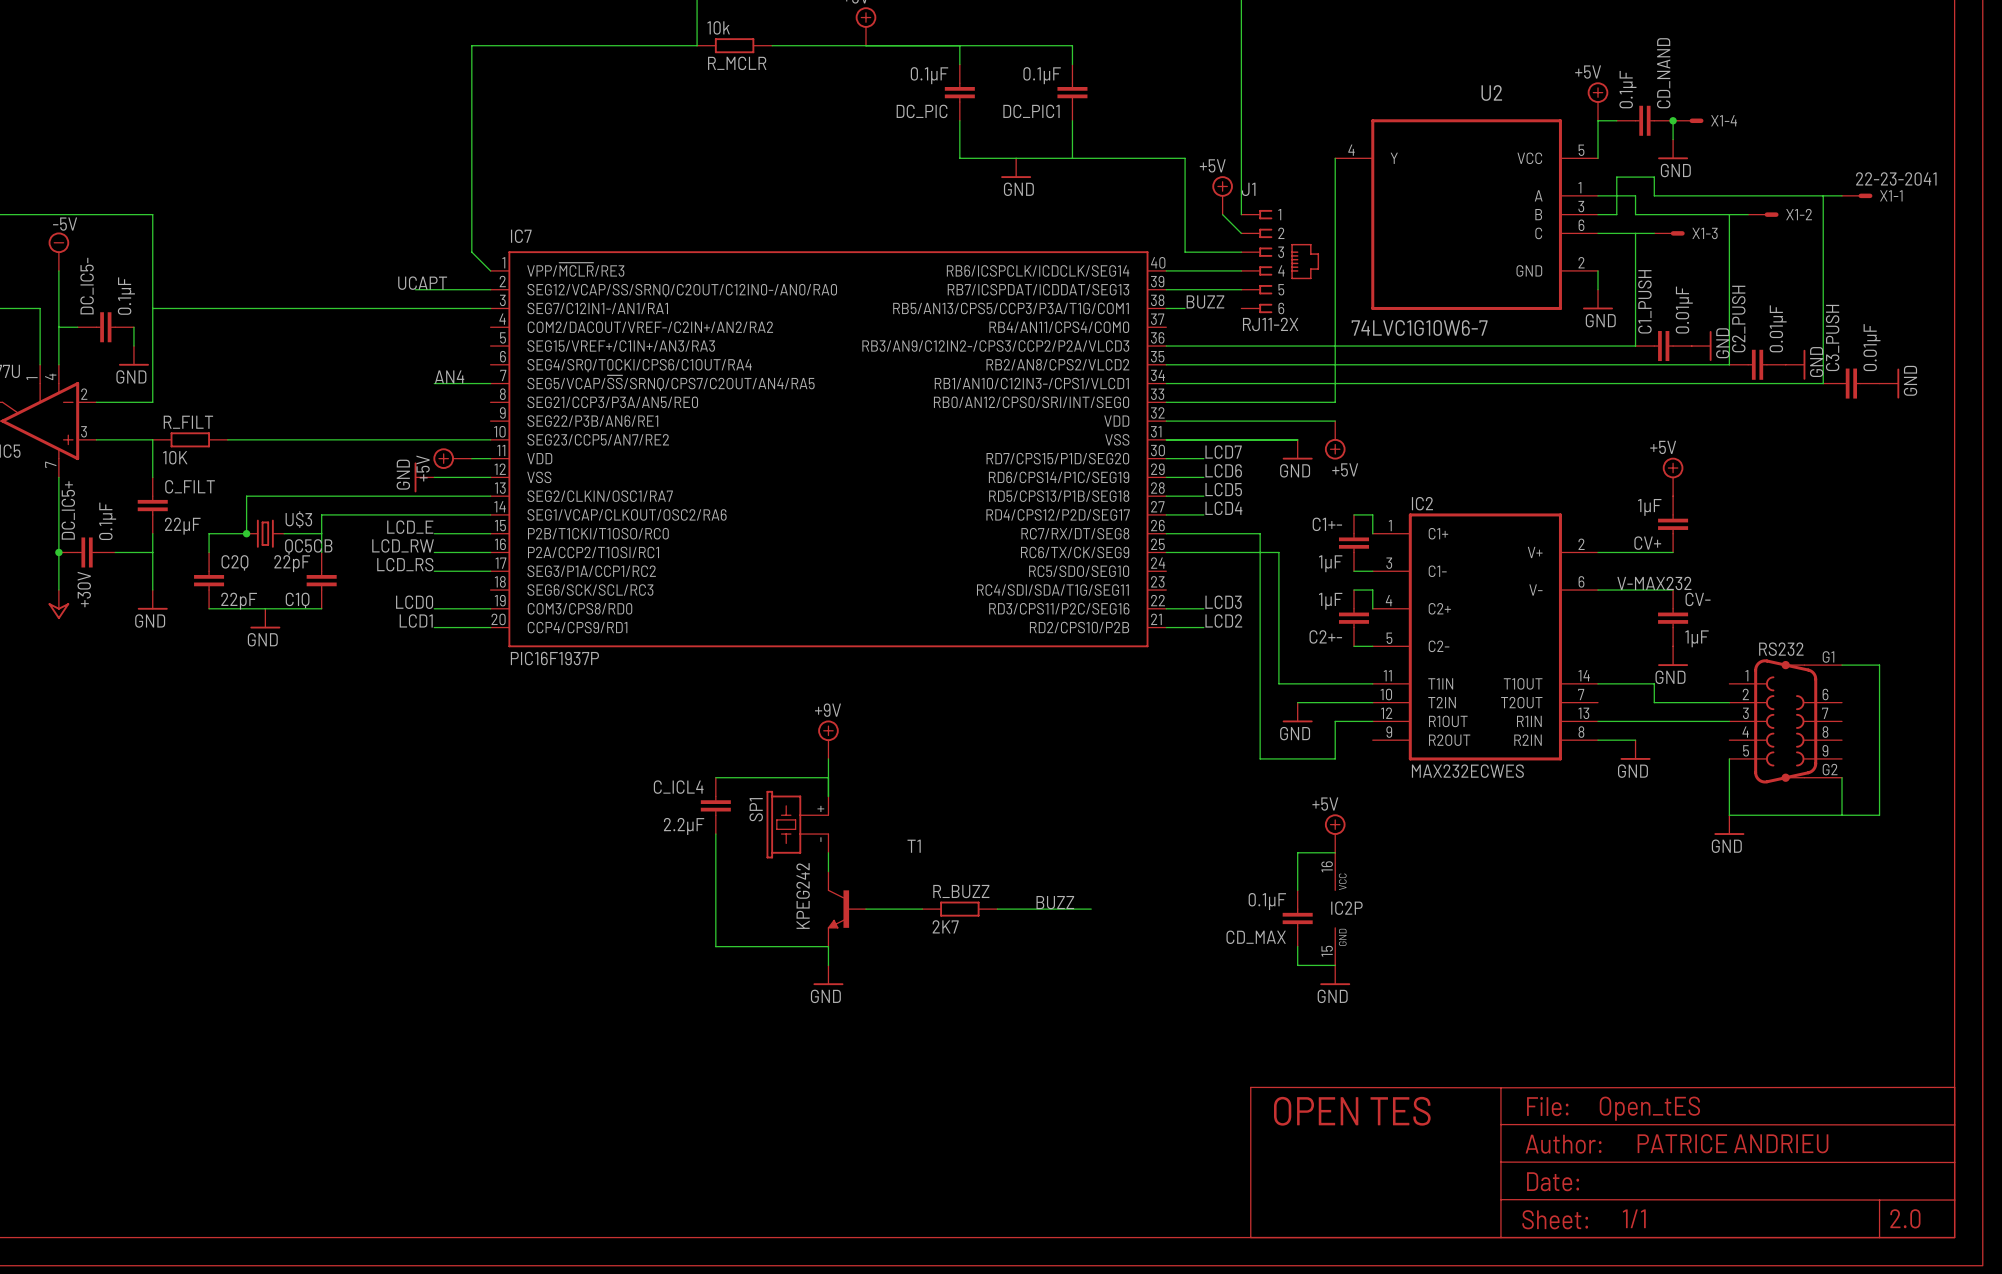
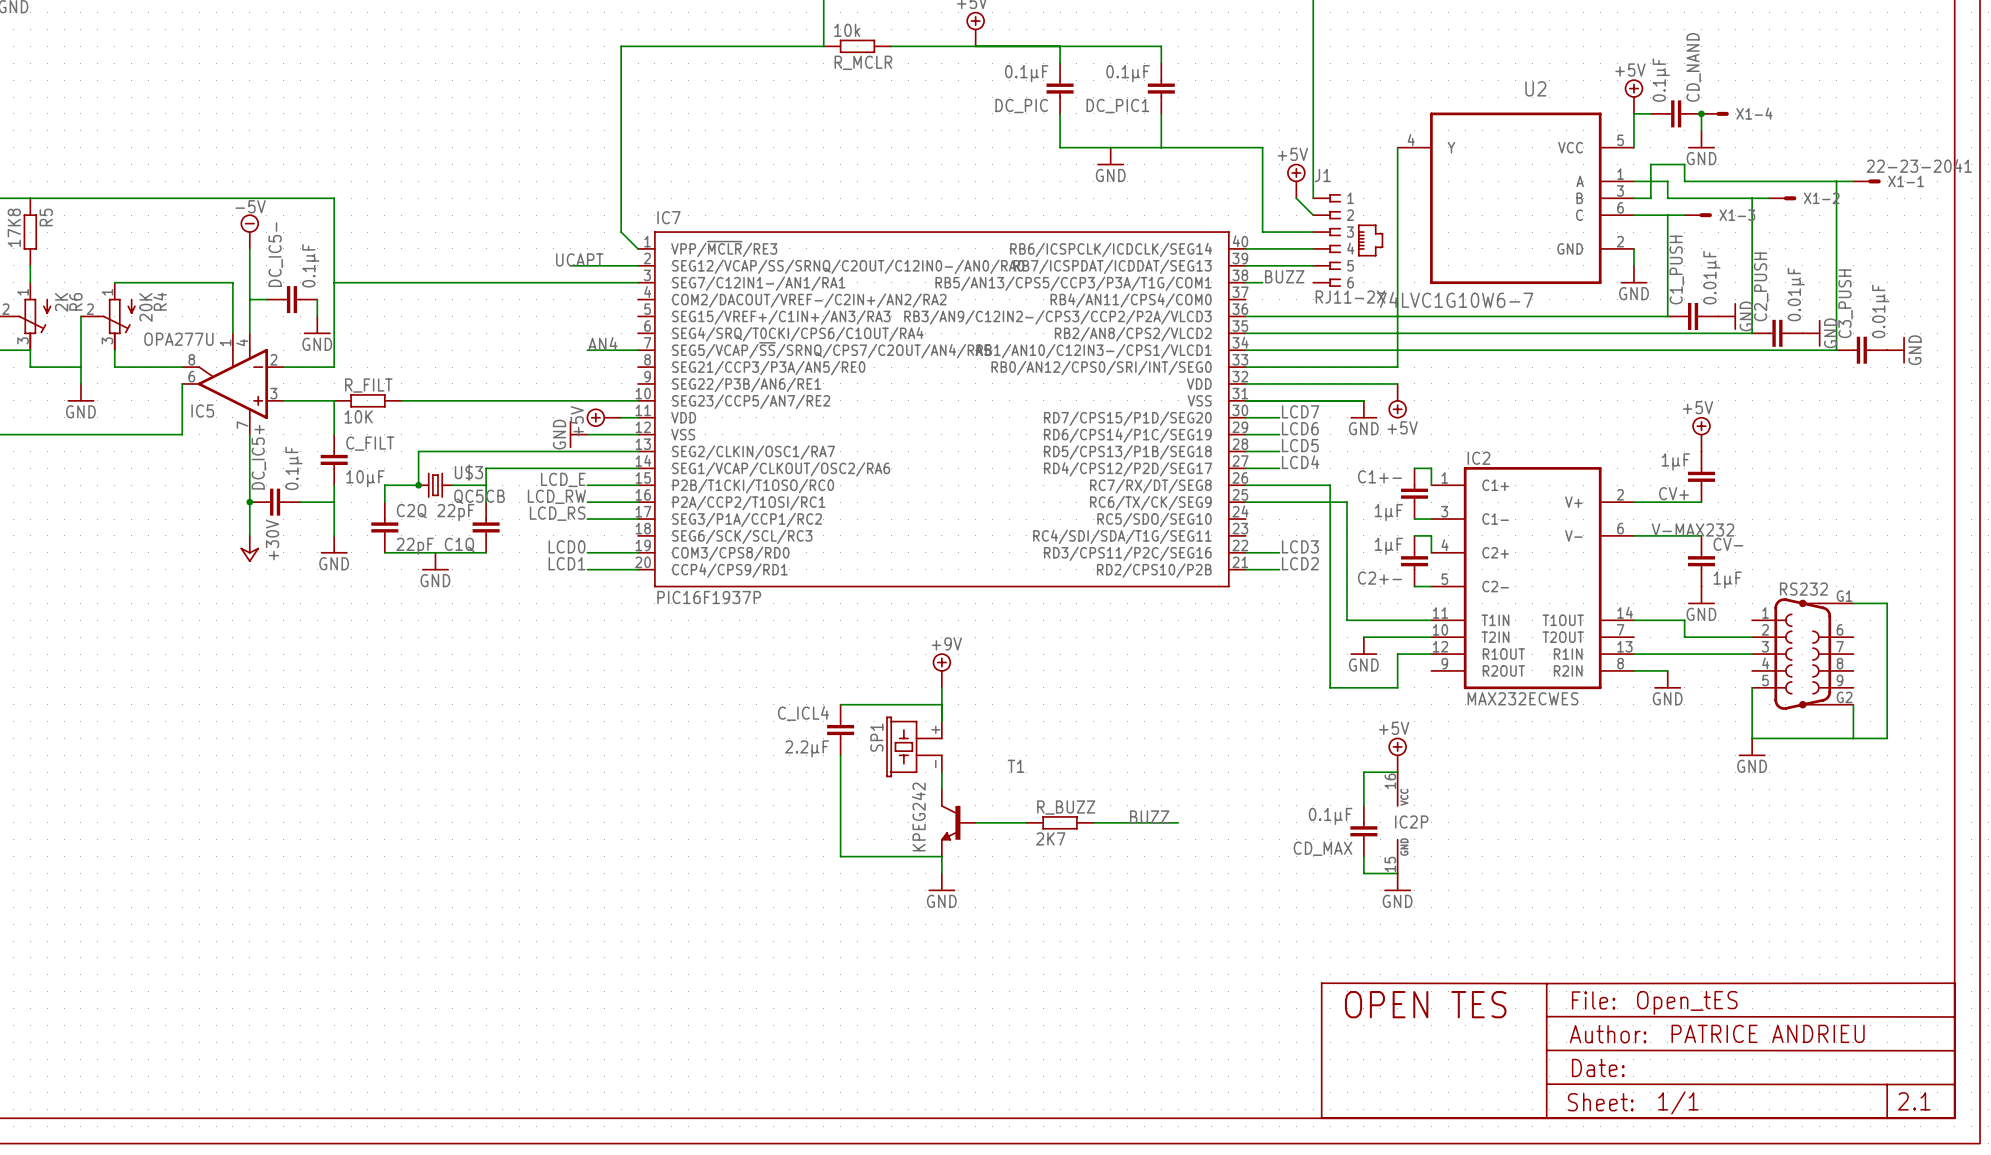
C_FILT value: 22µF (182, 526) -> 10µF (365, 478)
part text: 2.0 (1905, 1218) -> 2.1 (1914, 1101)

